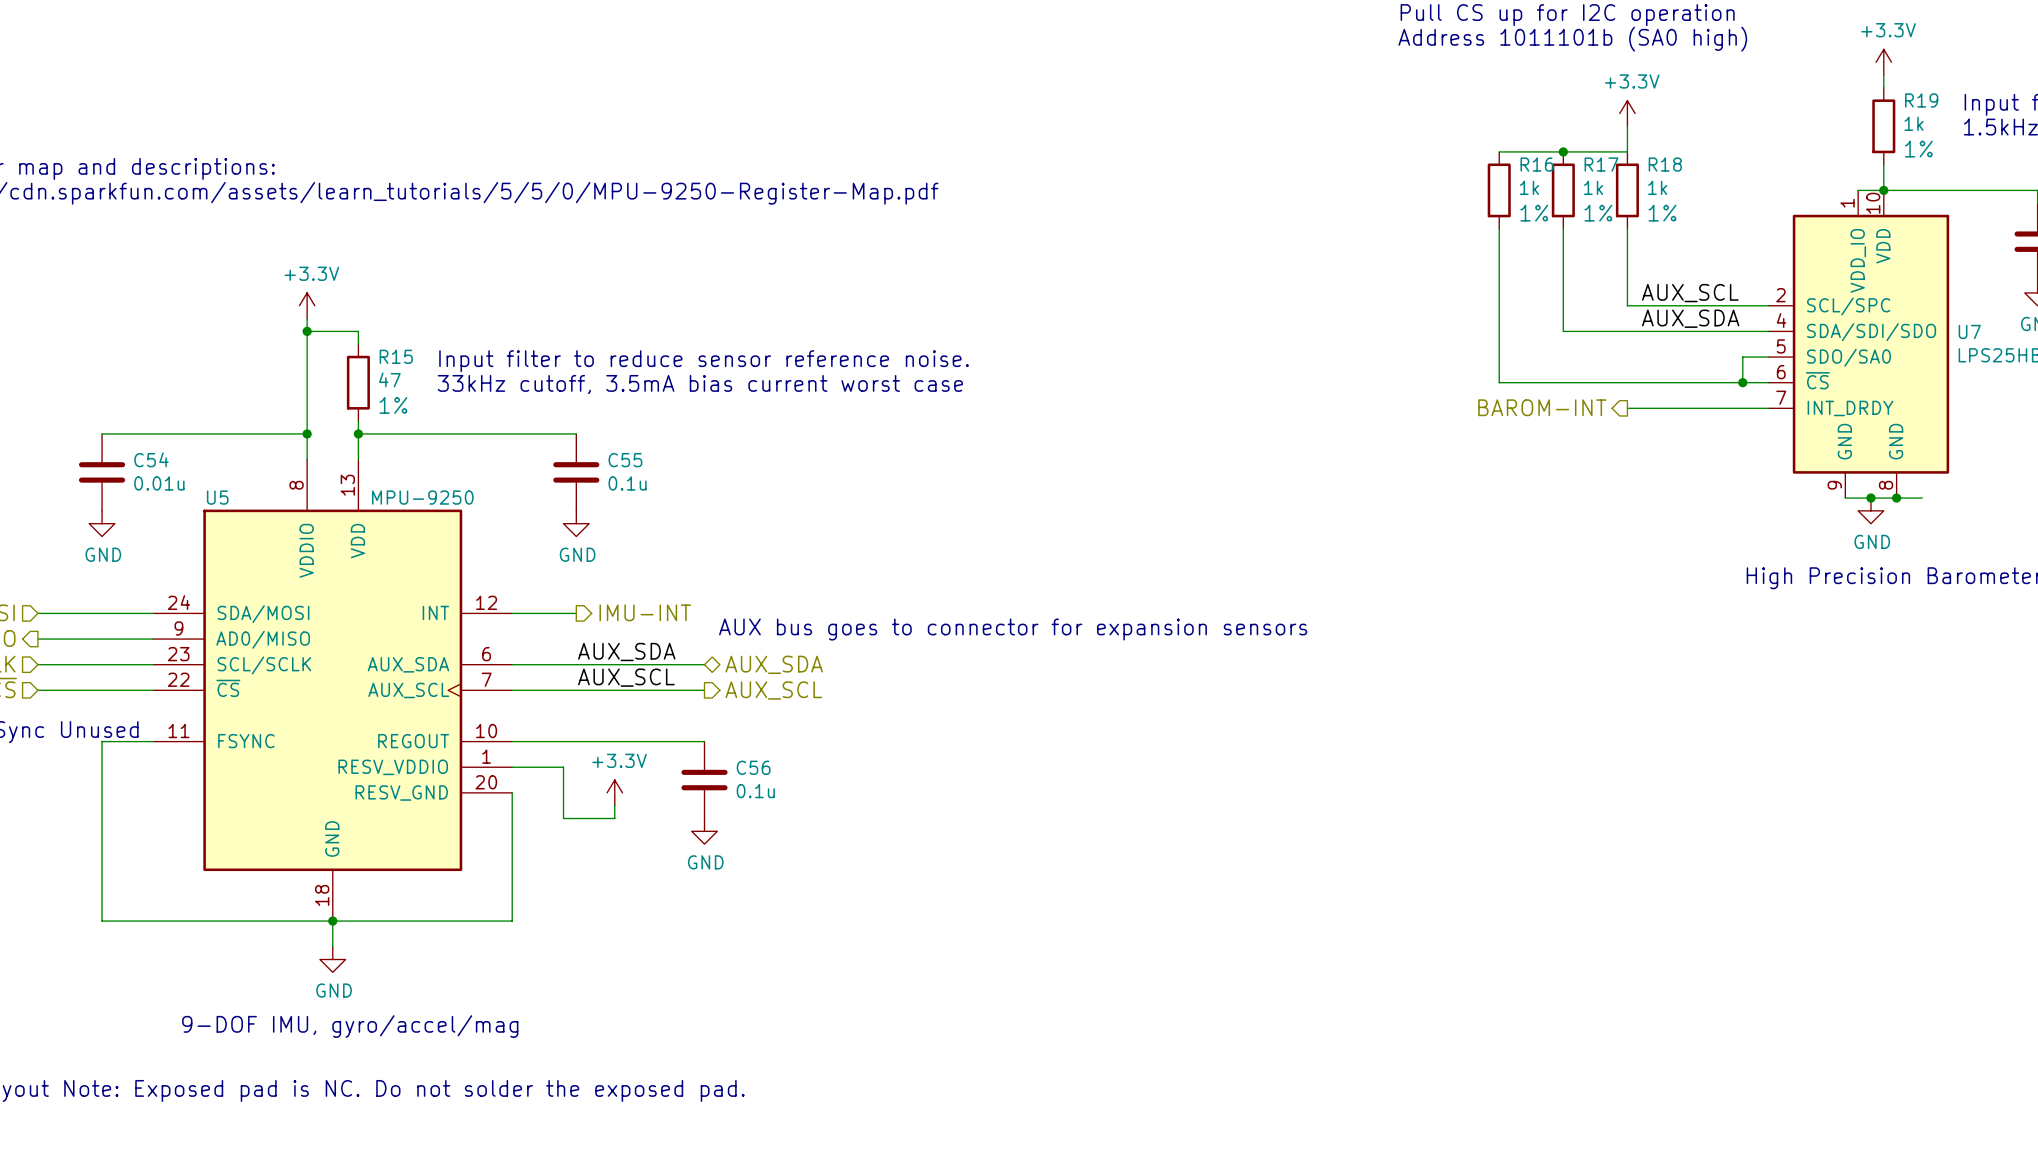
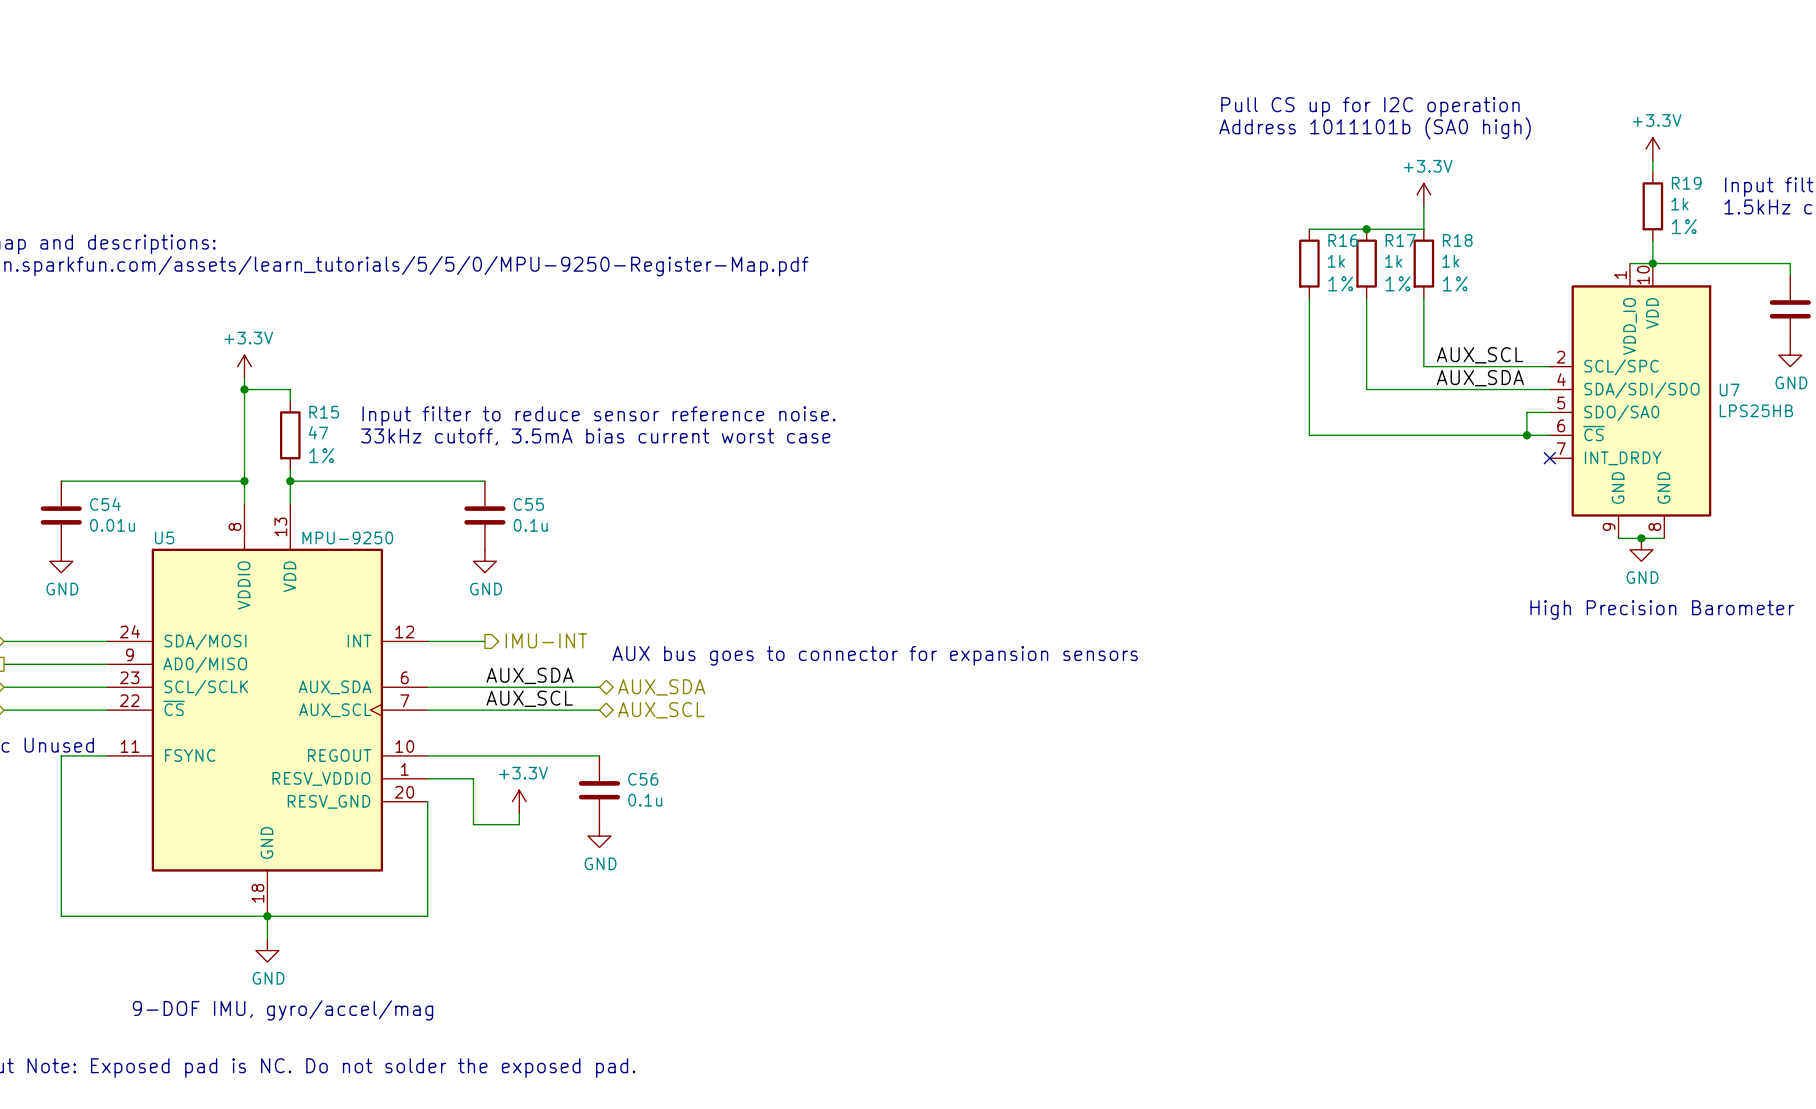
hierarchical label: BAROM-INT (1542, 407) -> none
wire: (1627, 408) (1768, 408) -> none
no-connect mark: none -> (1549, 458)
wire: (1896, 498) (1922, 498) -> none
junction: (1896, 498) -> none
hierarchical label shape: output (773, 690) -> bidirectional (661, 710)

